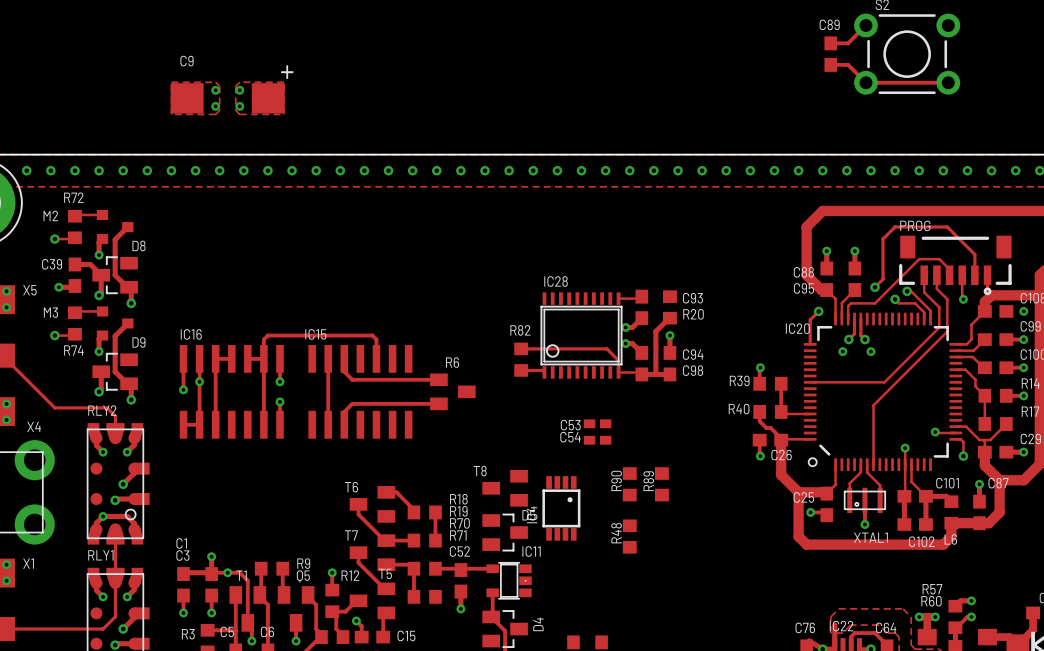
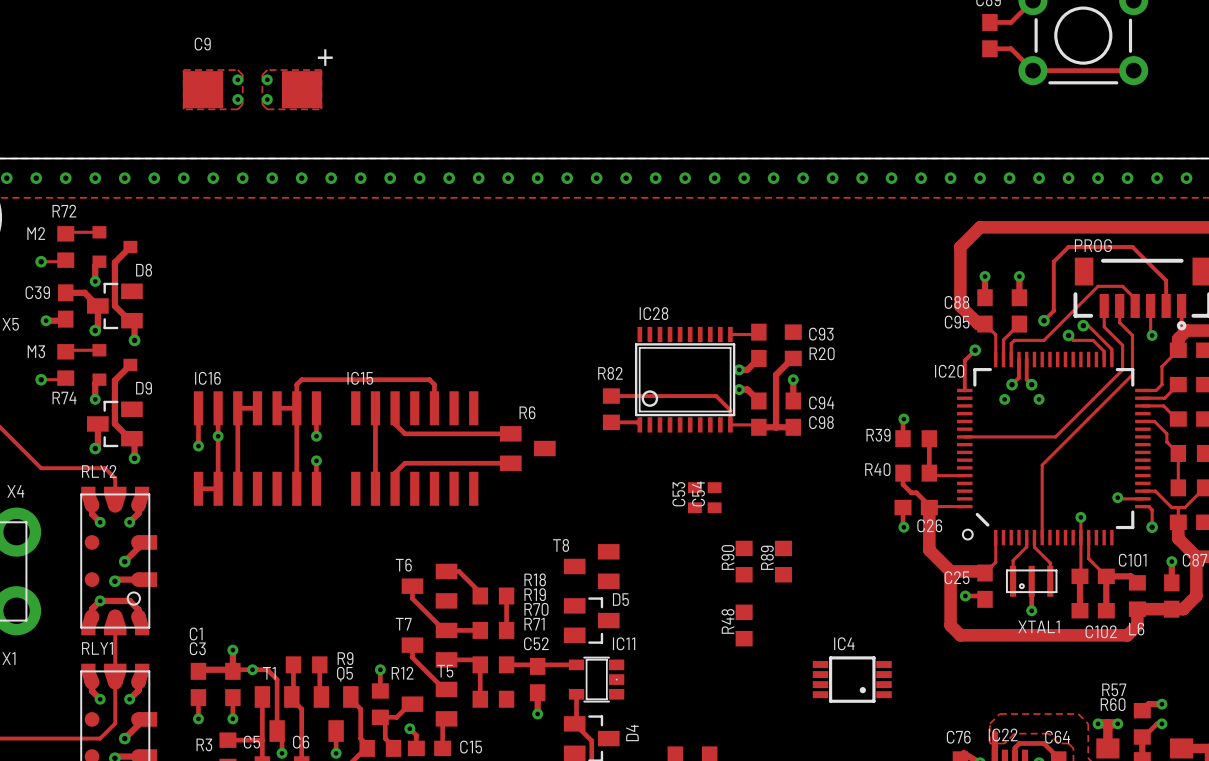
C53 name rotation: 0° (570, 425) -> 90° counterclockwise (678, 494)
C54 name rotation: 0° (570, 437) -> 90° counterclockwise (698, 493)
IC4 rotation: 0° (561, 508) -> 90° clockwise (852, 679)
IC4 position: (561, 508) -> (852, 679)

